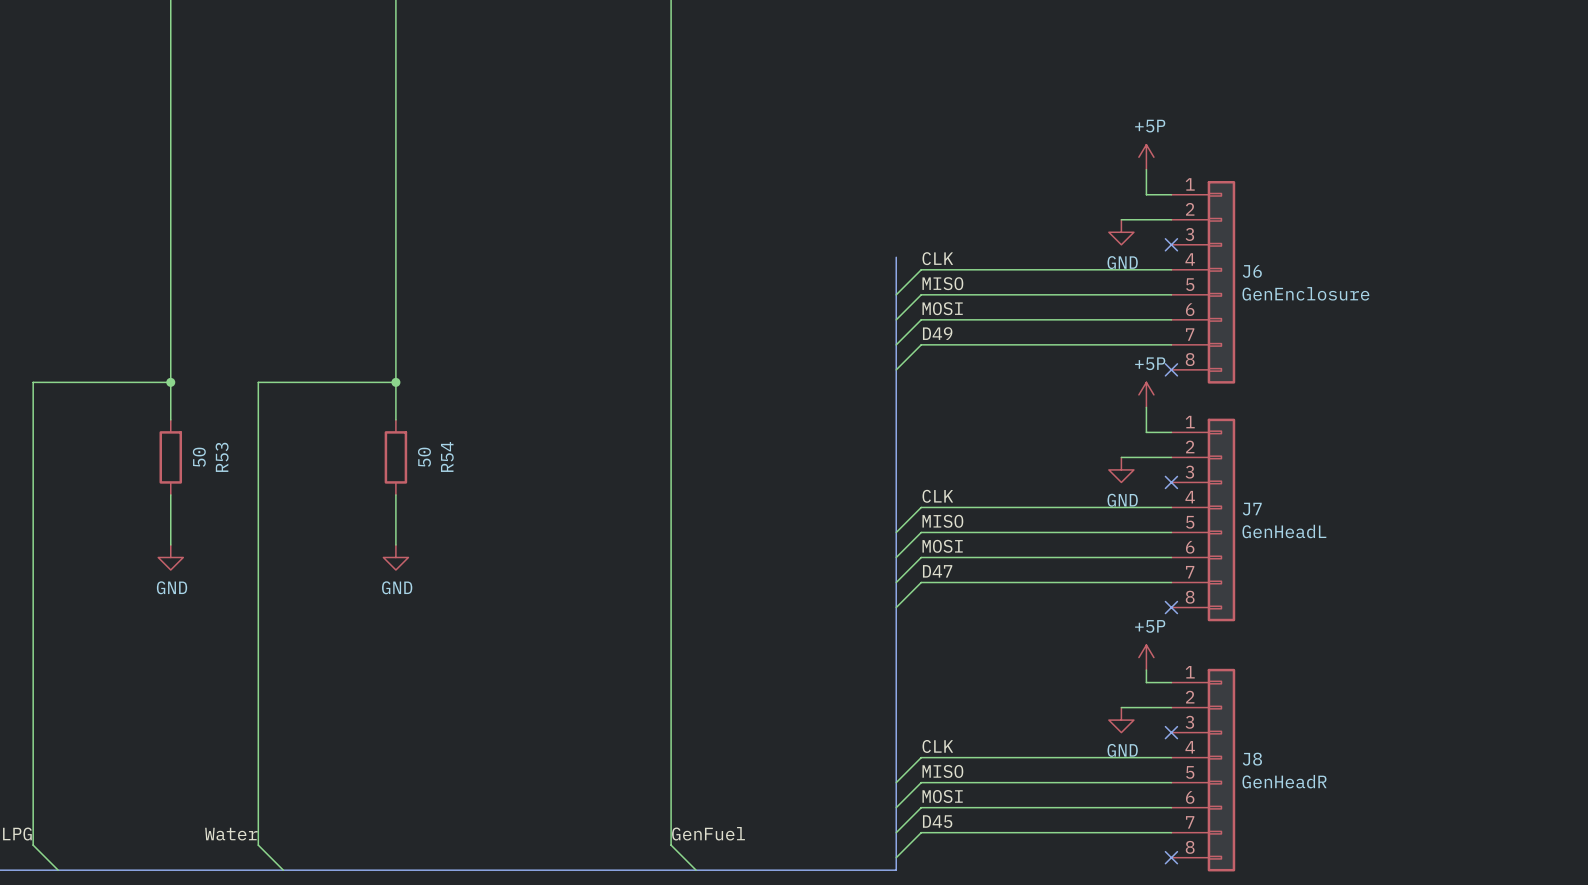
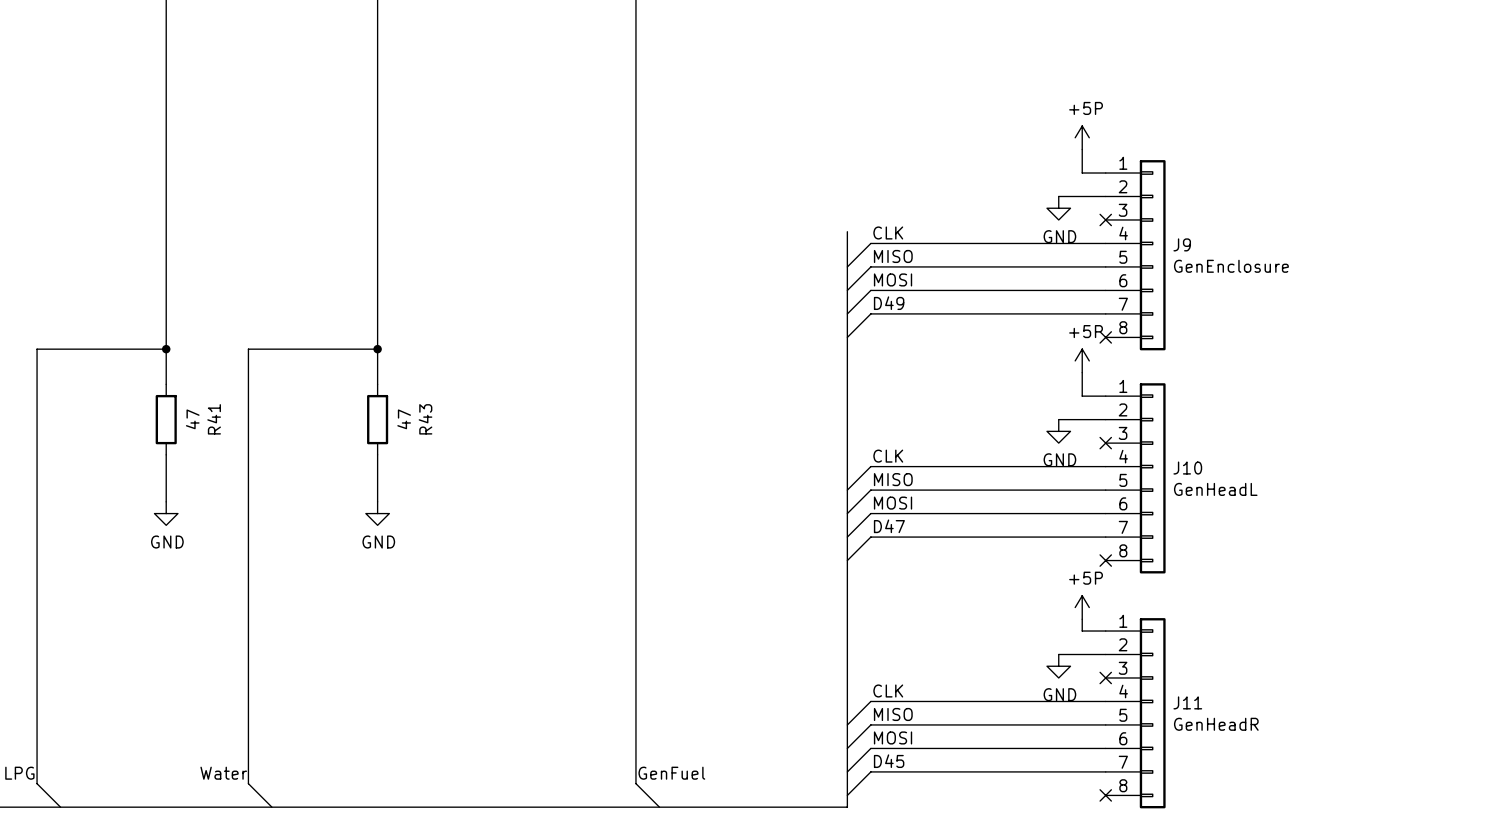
J6 name: J6 (1252, 271) -> J9 (1182, 244)
R54 name: R54 (447, 456) -> R43 (425, 419)
R53 value: 50 (199, 457) -> 47 (192, 419)
R53 name: R53 (222, 457) -> R41 (214, 419)
R54 value: 50 (424, 457) -> 47 (404, 419)
J7 name: J7 (1252, 509) -> J10 (1187, 468)
J8 name: J8 (1252, 759) -> J11 (1187, 702)

